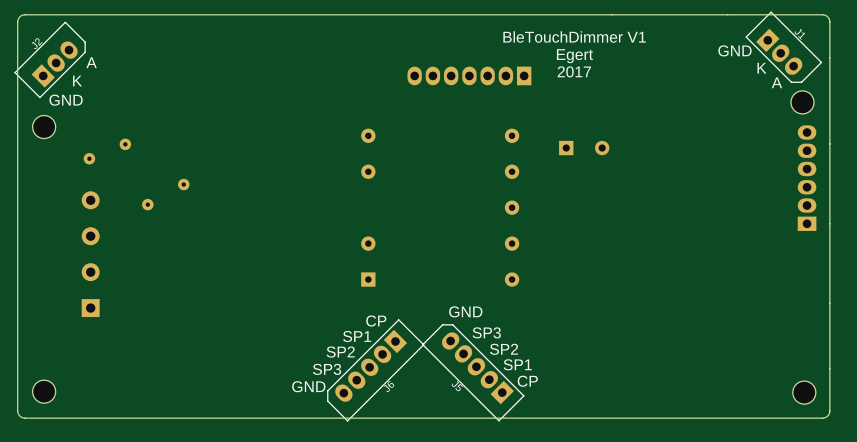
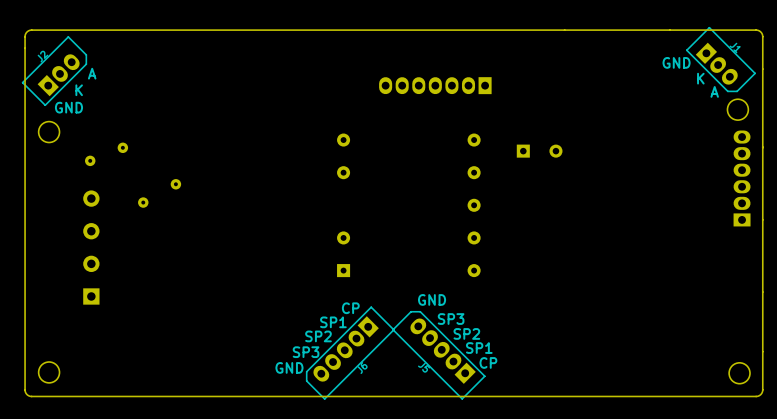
text: BleTouchDimmer V1 (574, 36) -> none
text: Egert (574, 56) -> none
text: 2017 (574, 71) -> none

